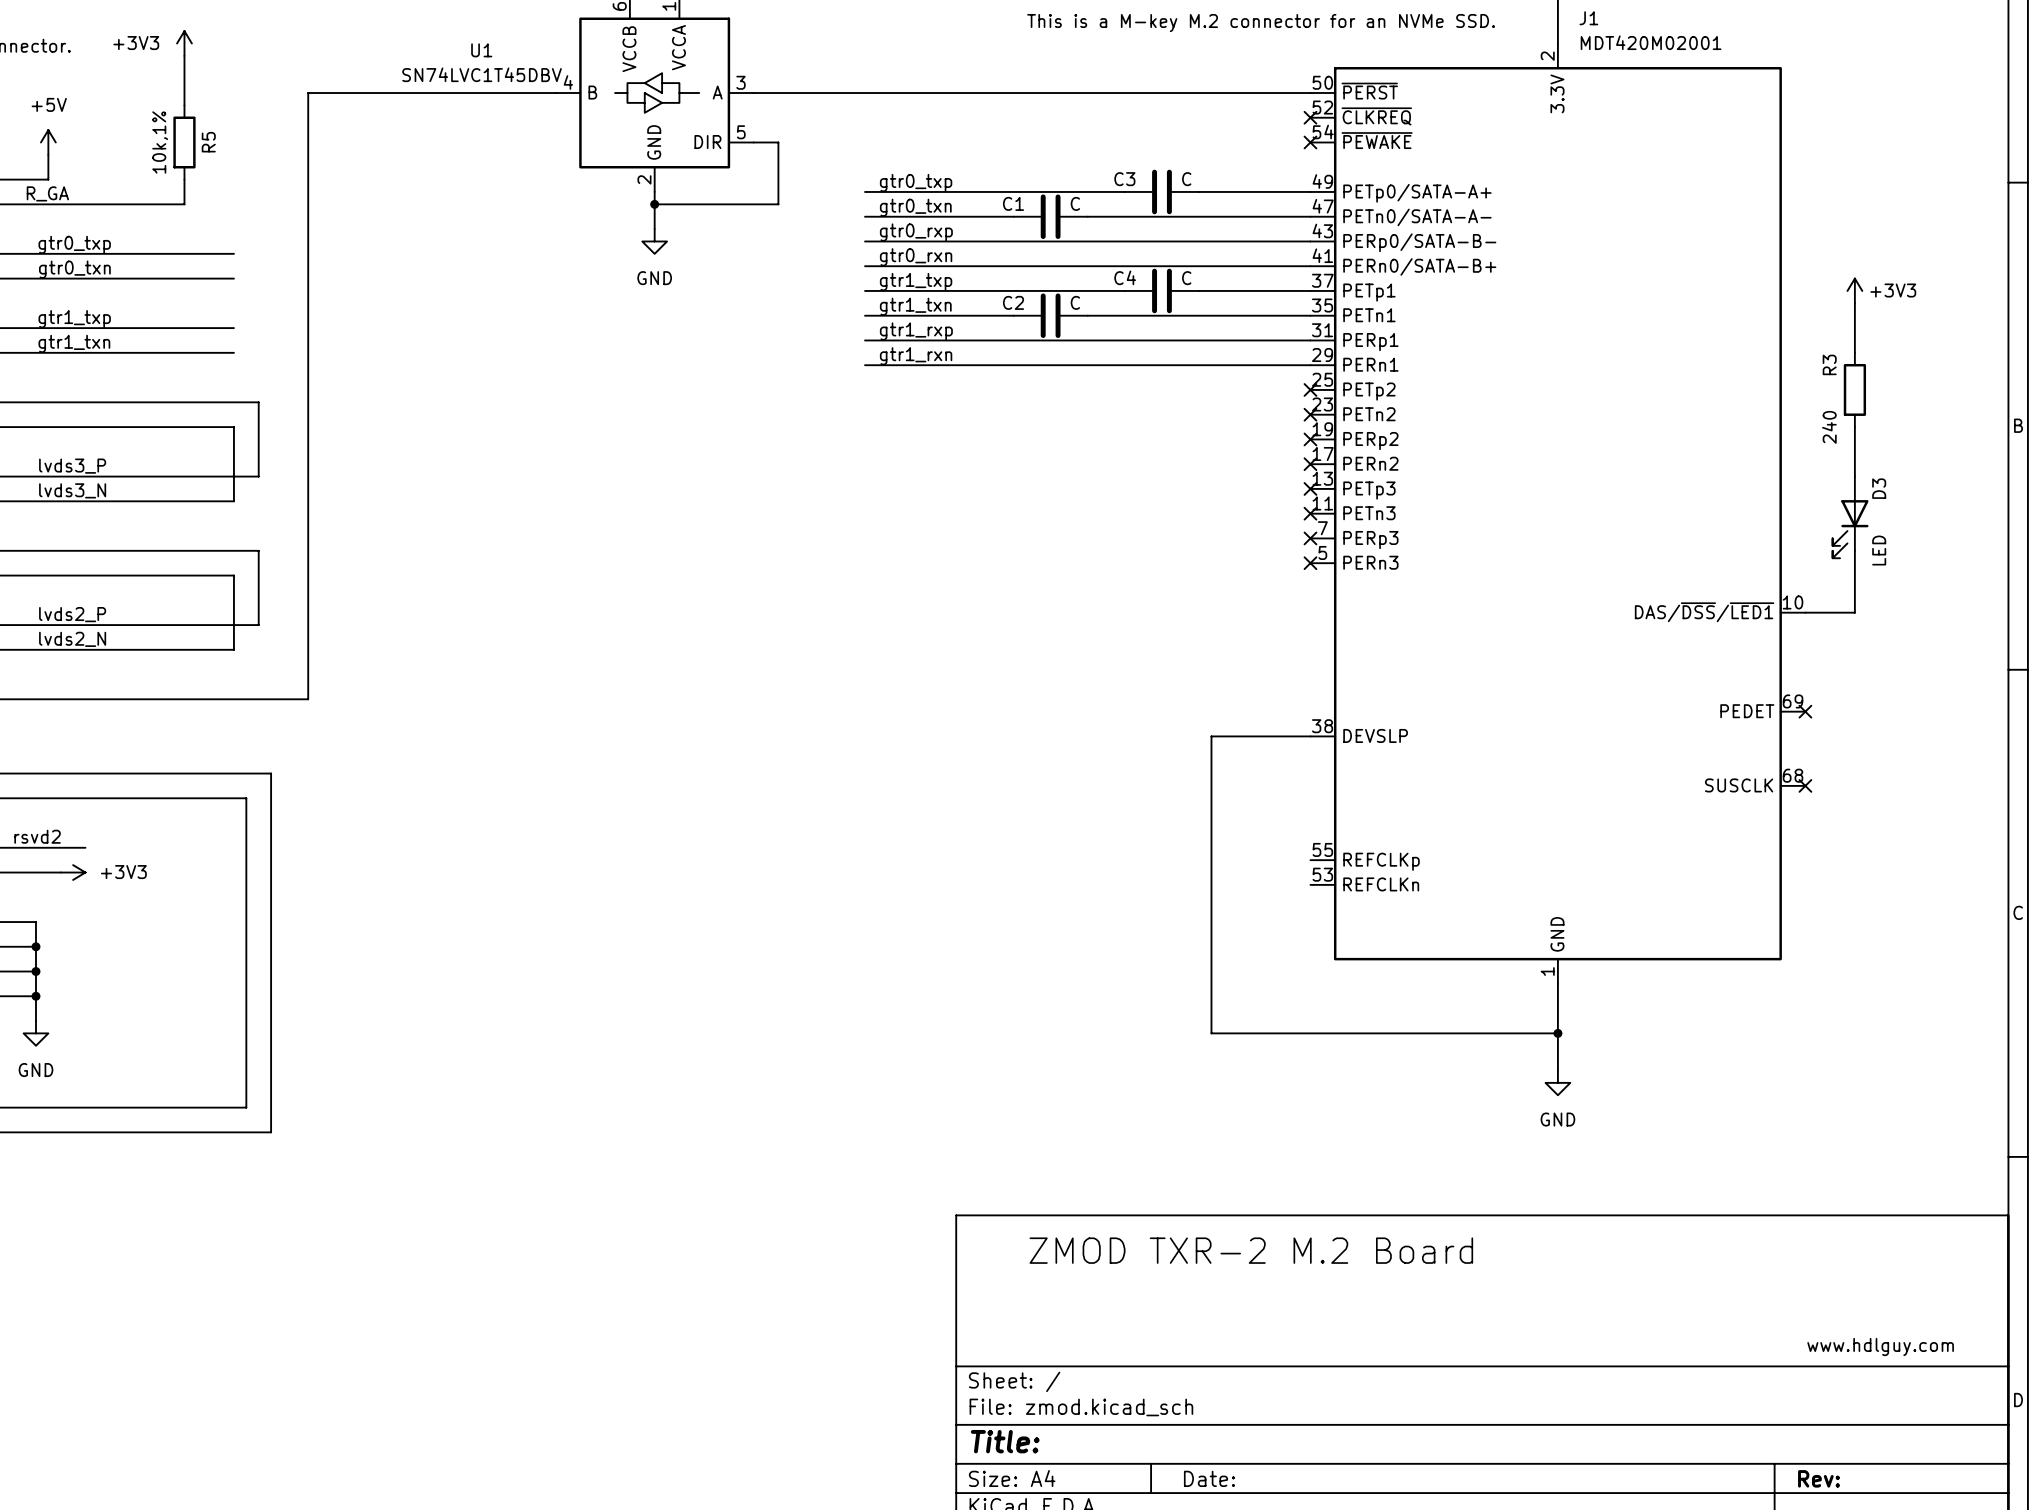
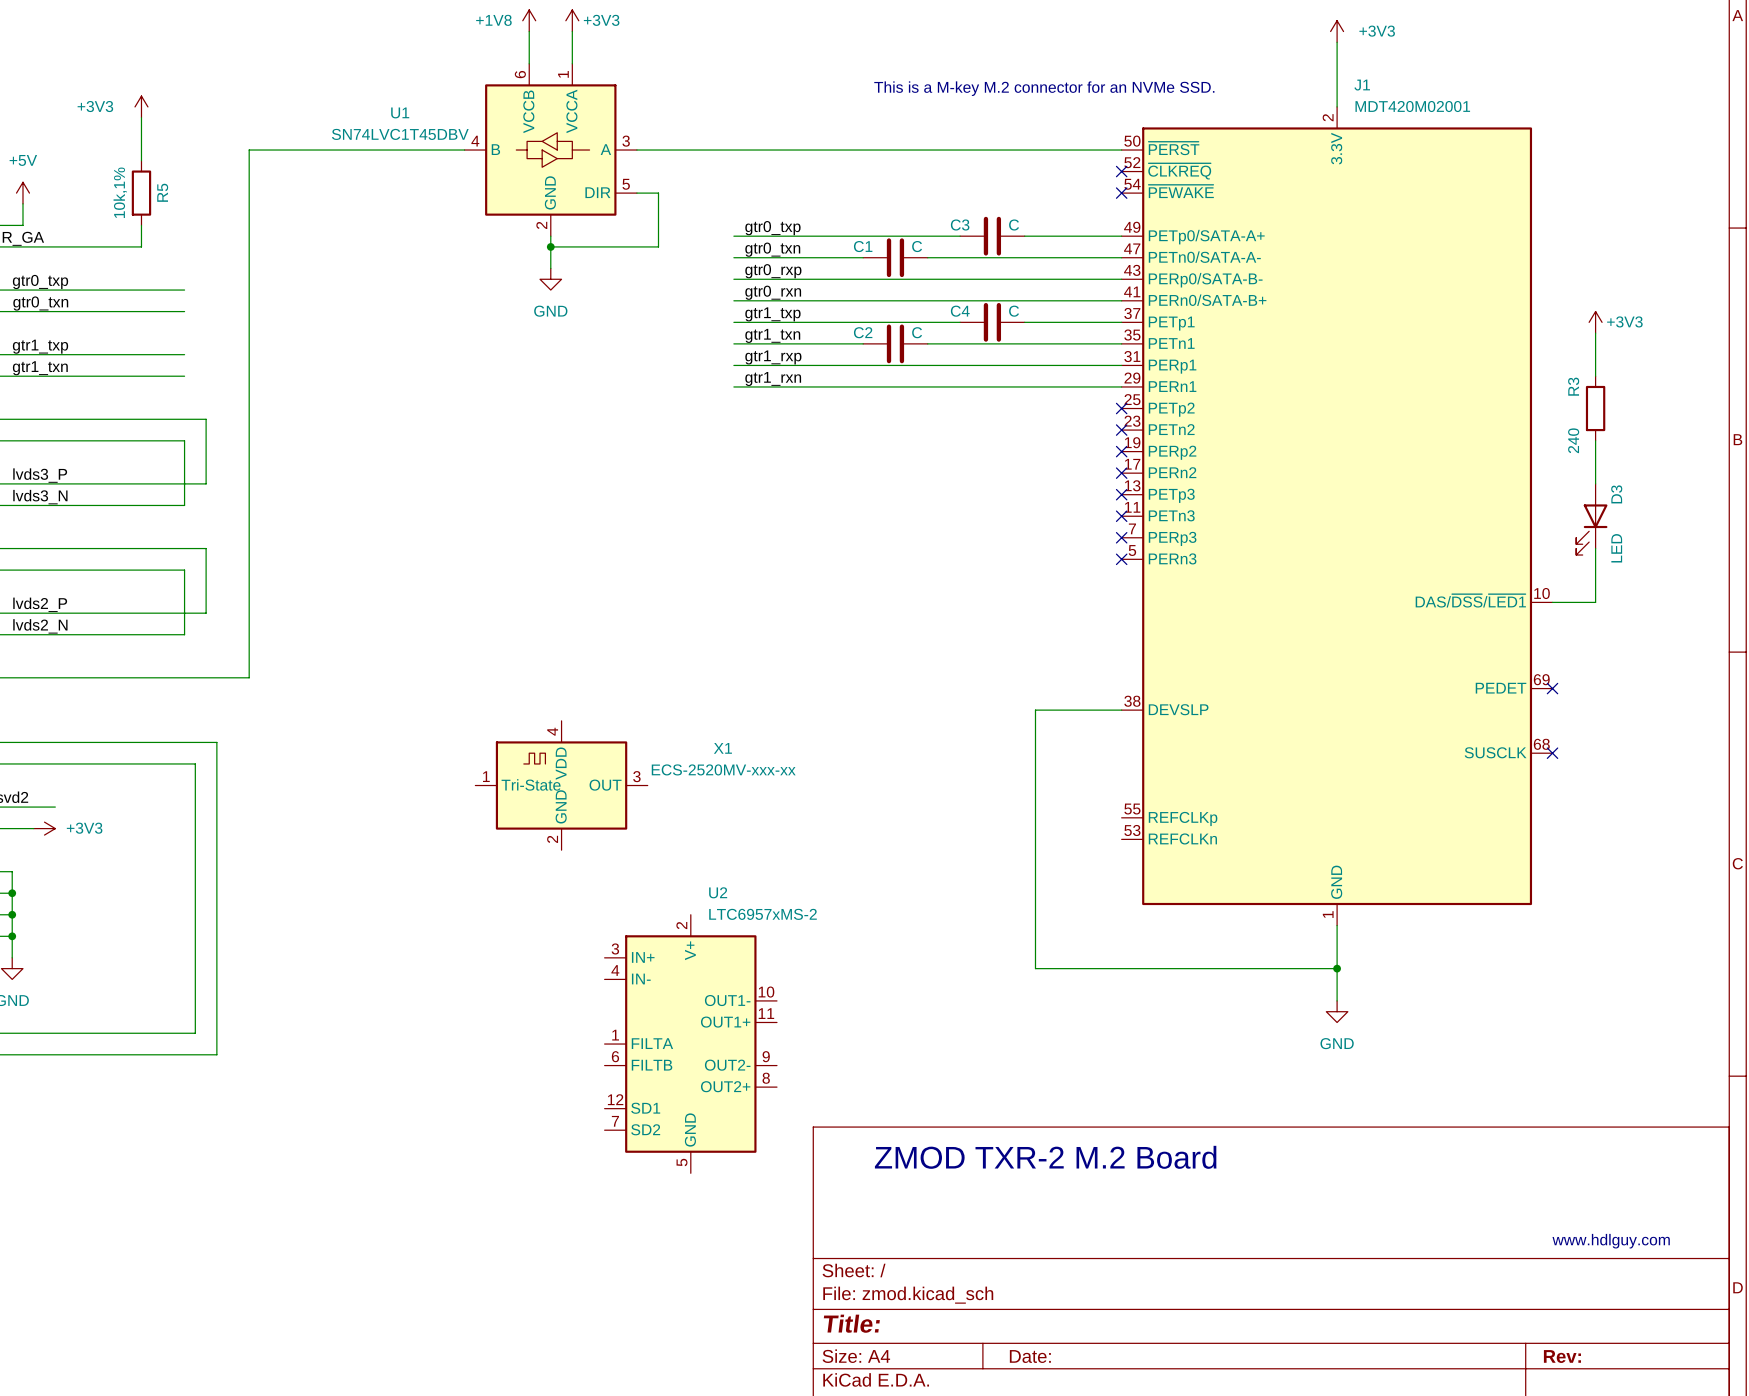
X1: none -> ECS-2520MV-xxx-xx (561, 785)
U2: none -> LTC6957xMS-2 (690, 1044)

